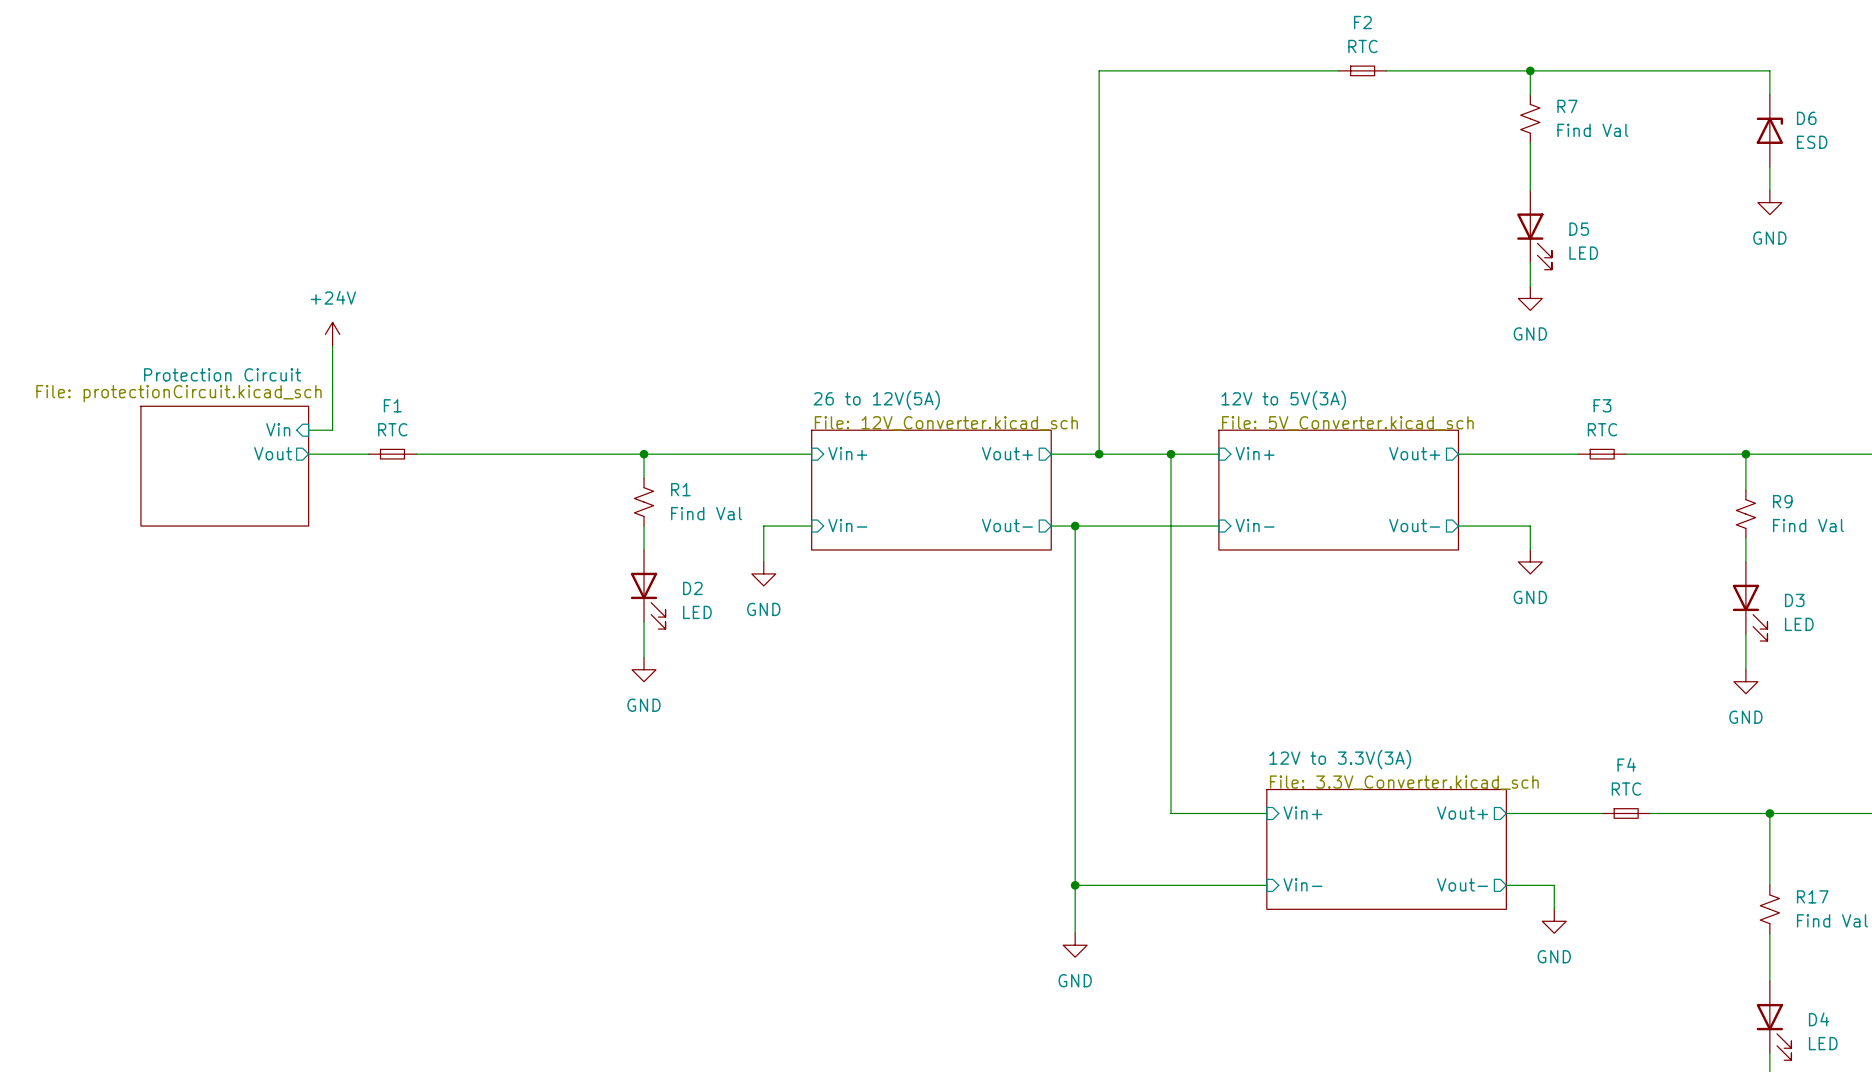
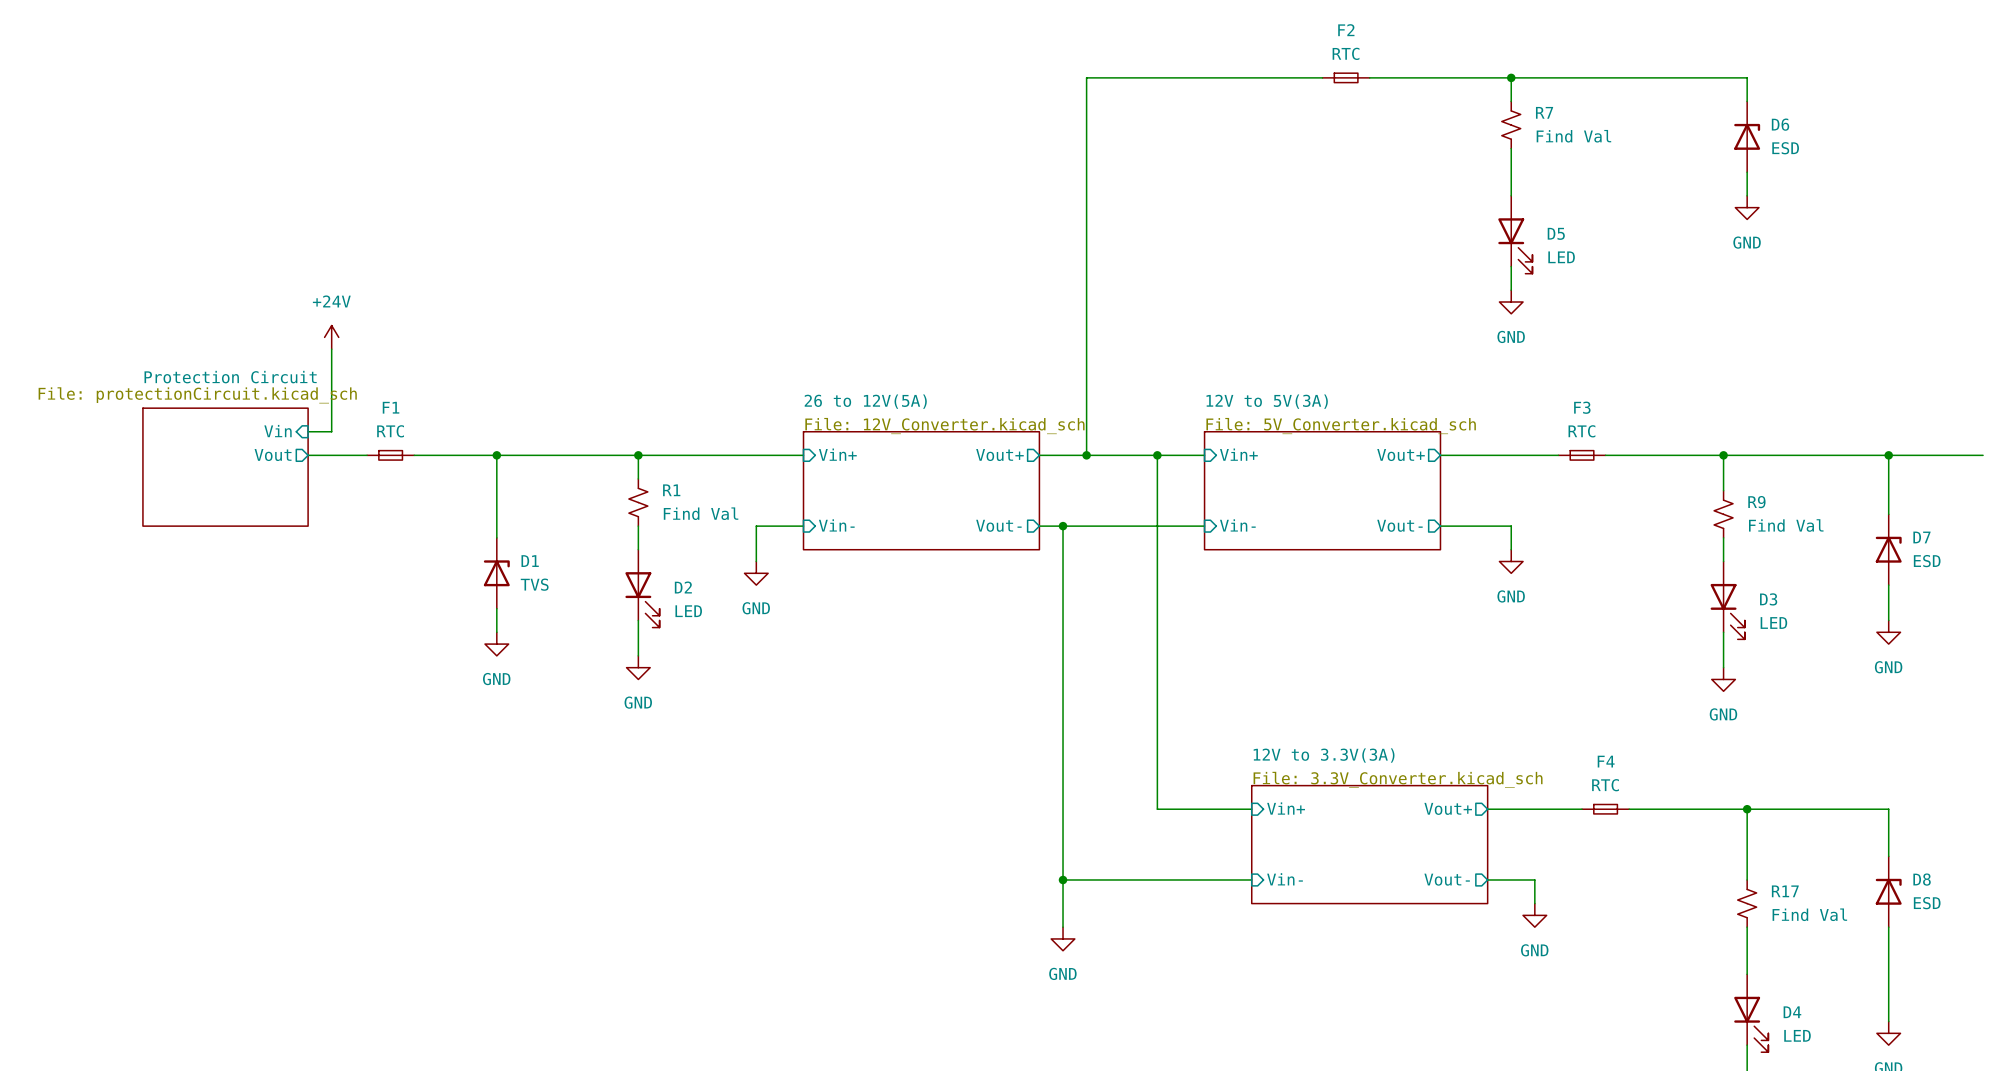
wire: none -> (496, 455) (496, 537)
junction: none -> (496, 455)
D1: none -> TVS (496, 573)
wire: none -> (496, 608) (496, 632)
power symbol: none -> GND (496, 644)

